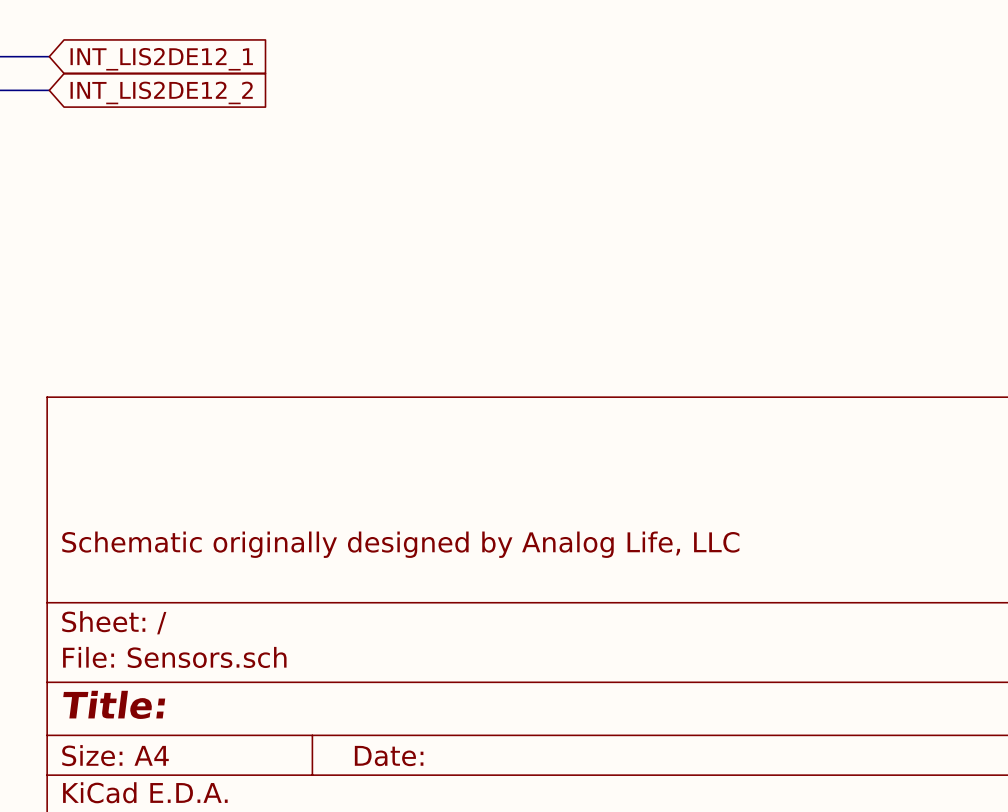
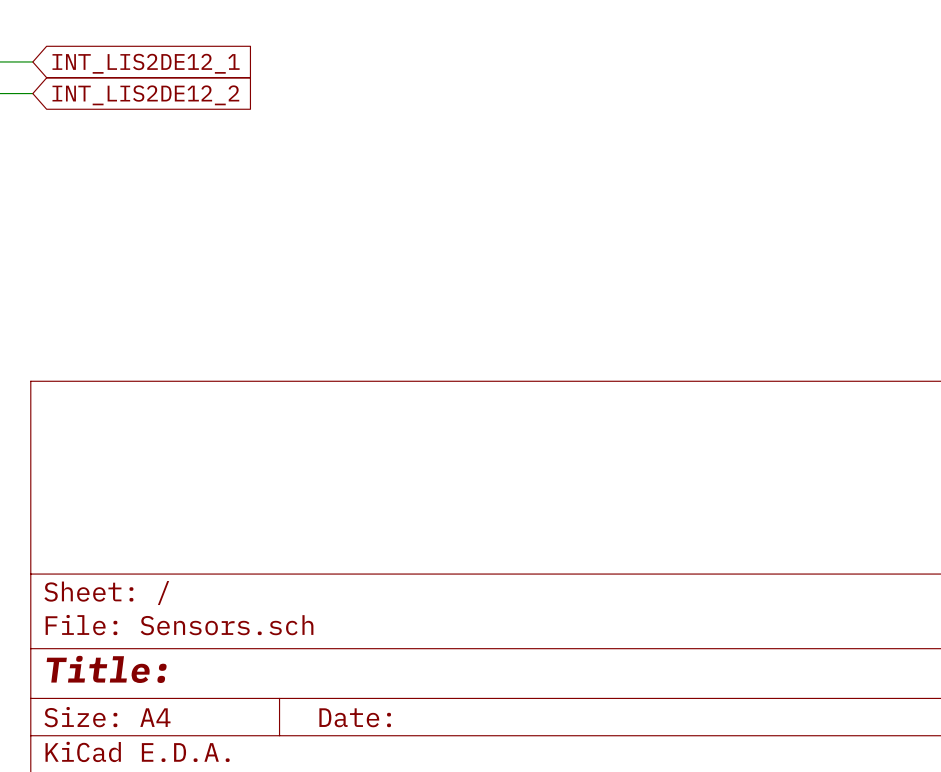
title block: Schematic originally designed by Analog Life, LLC (400, 544) -> none

